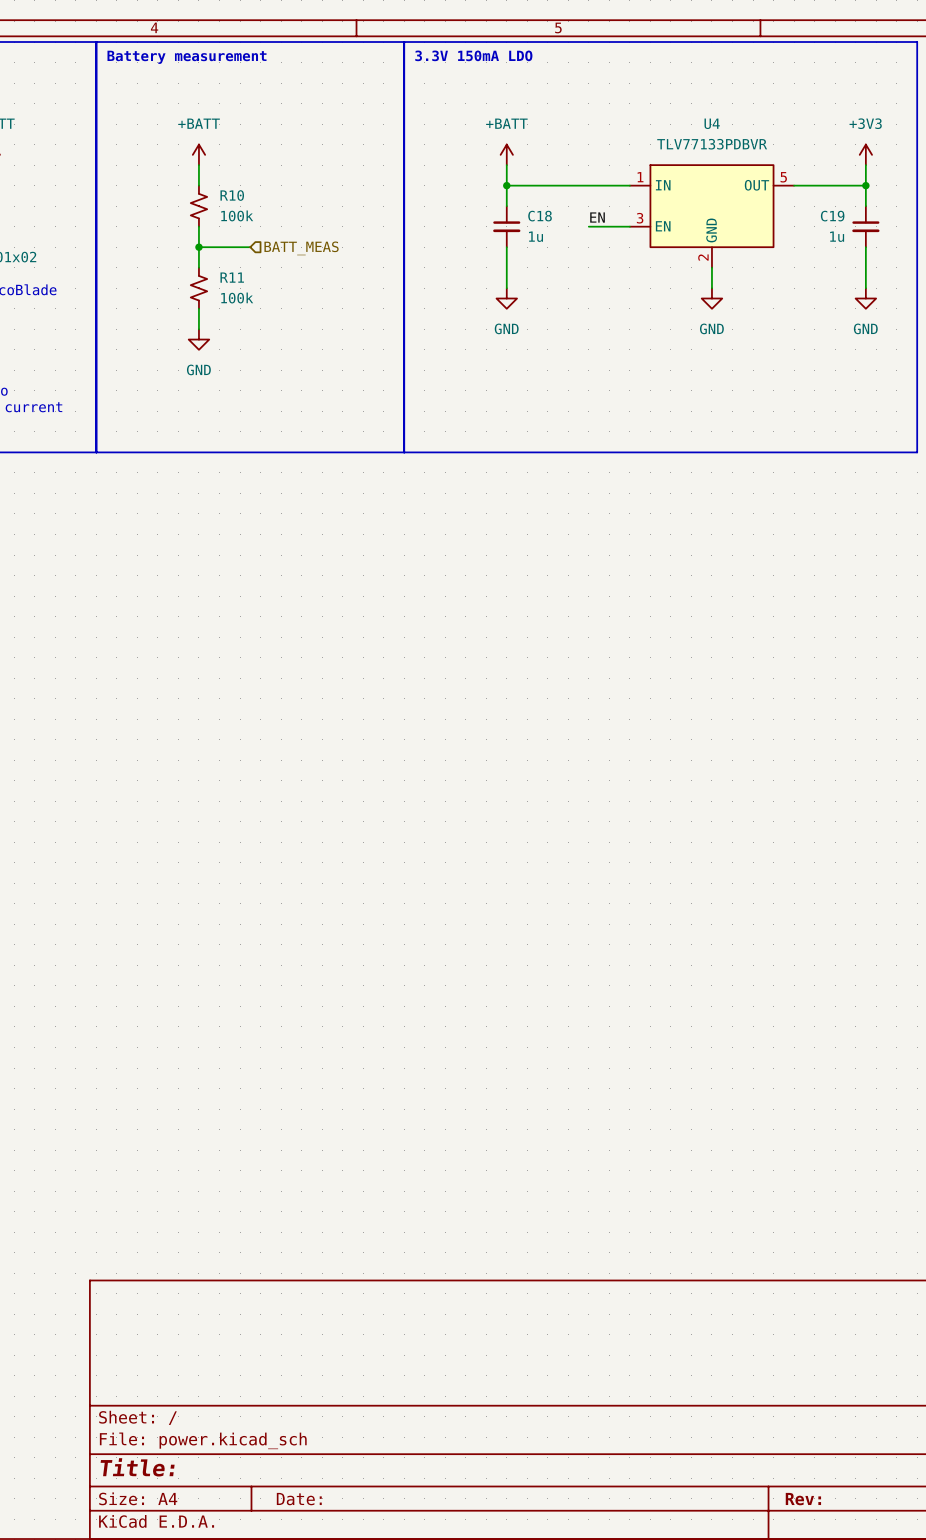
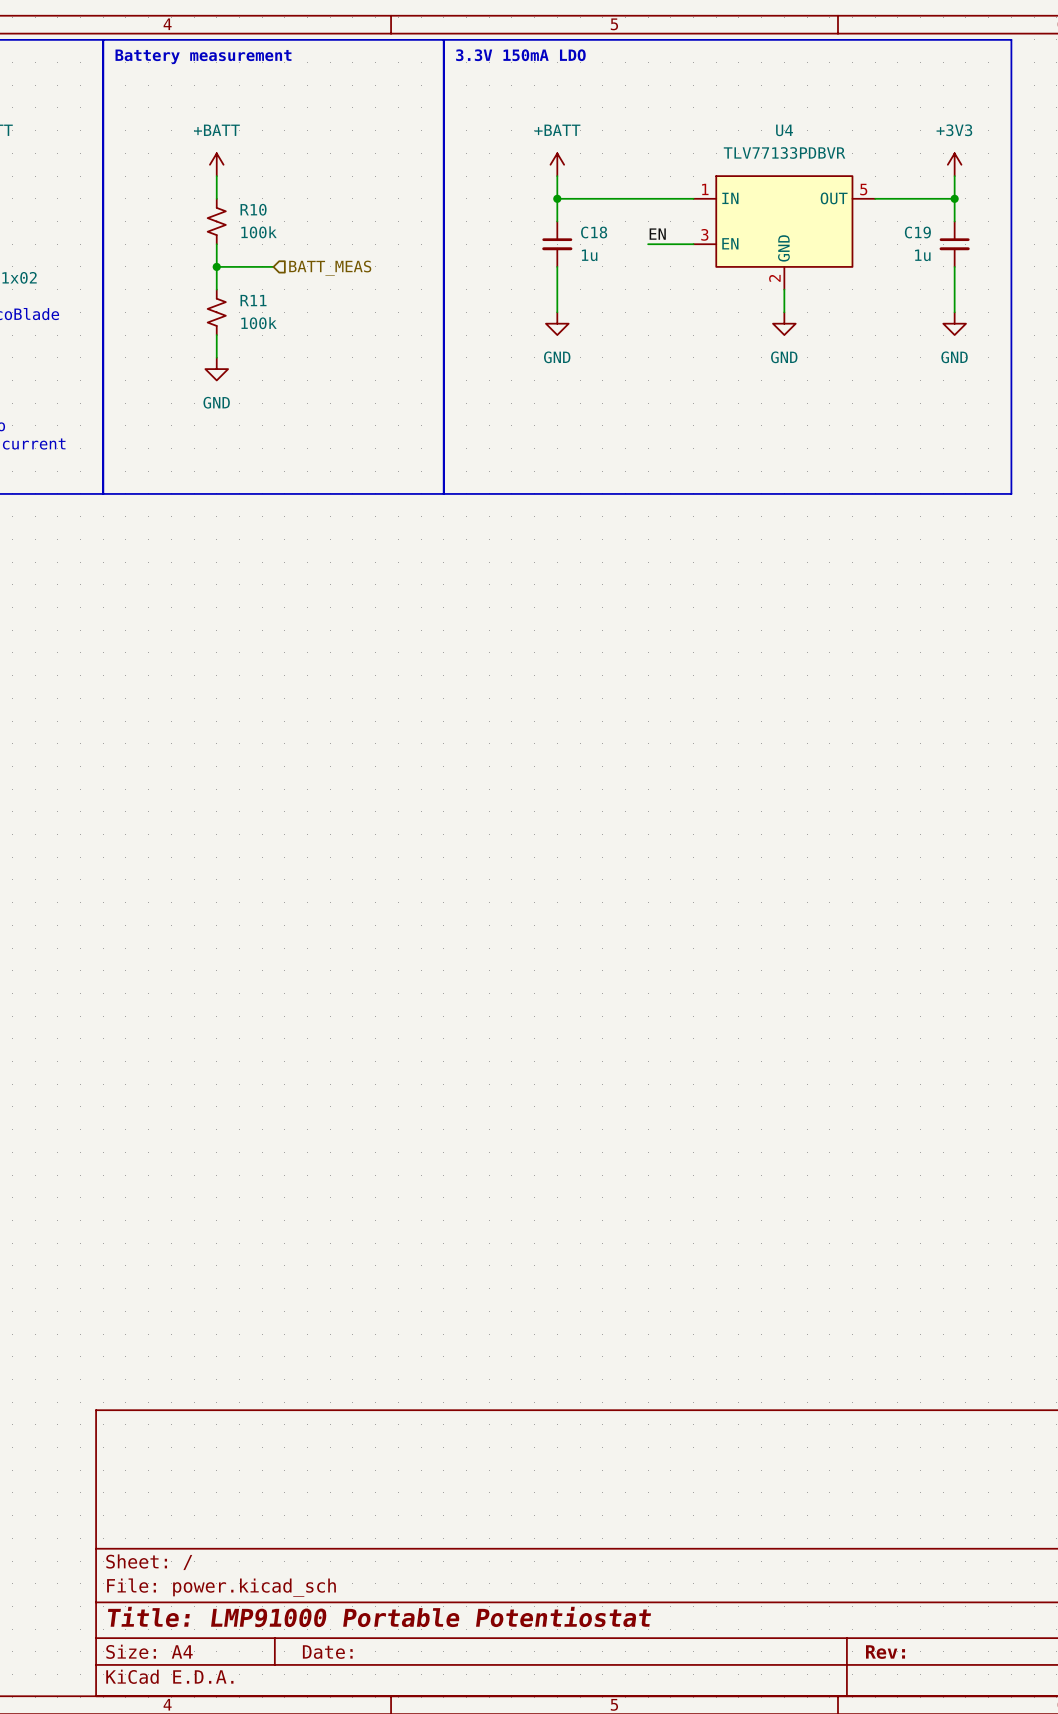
title block: Title: (137, 1467) -> Title: LMP91000 Portable Potentiostat (379, 1617)

